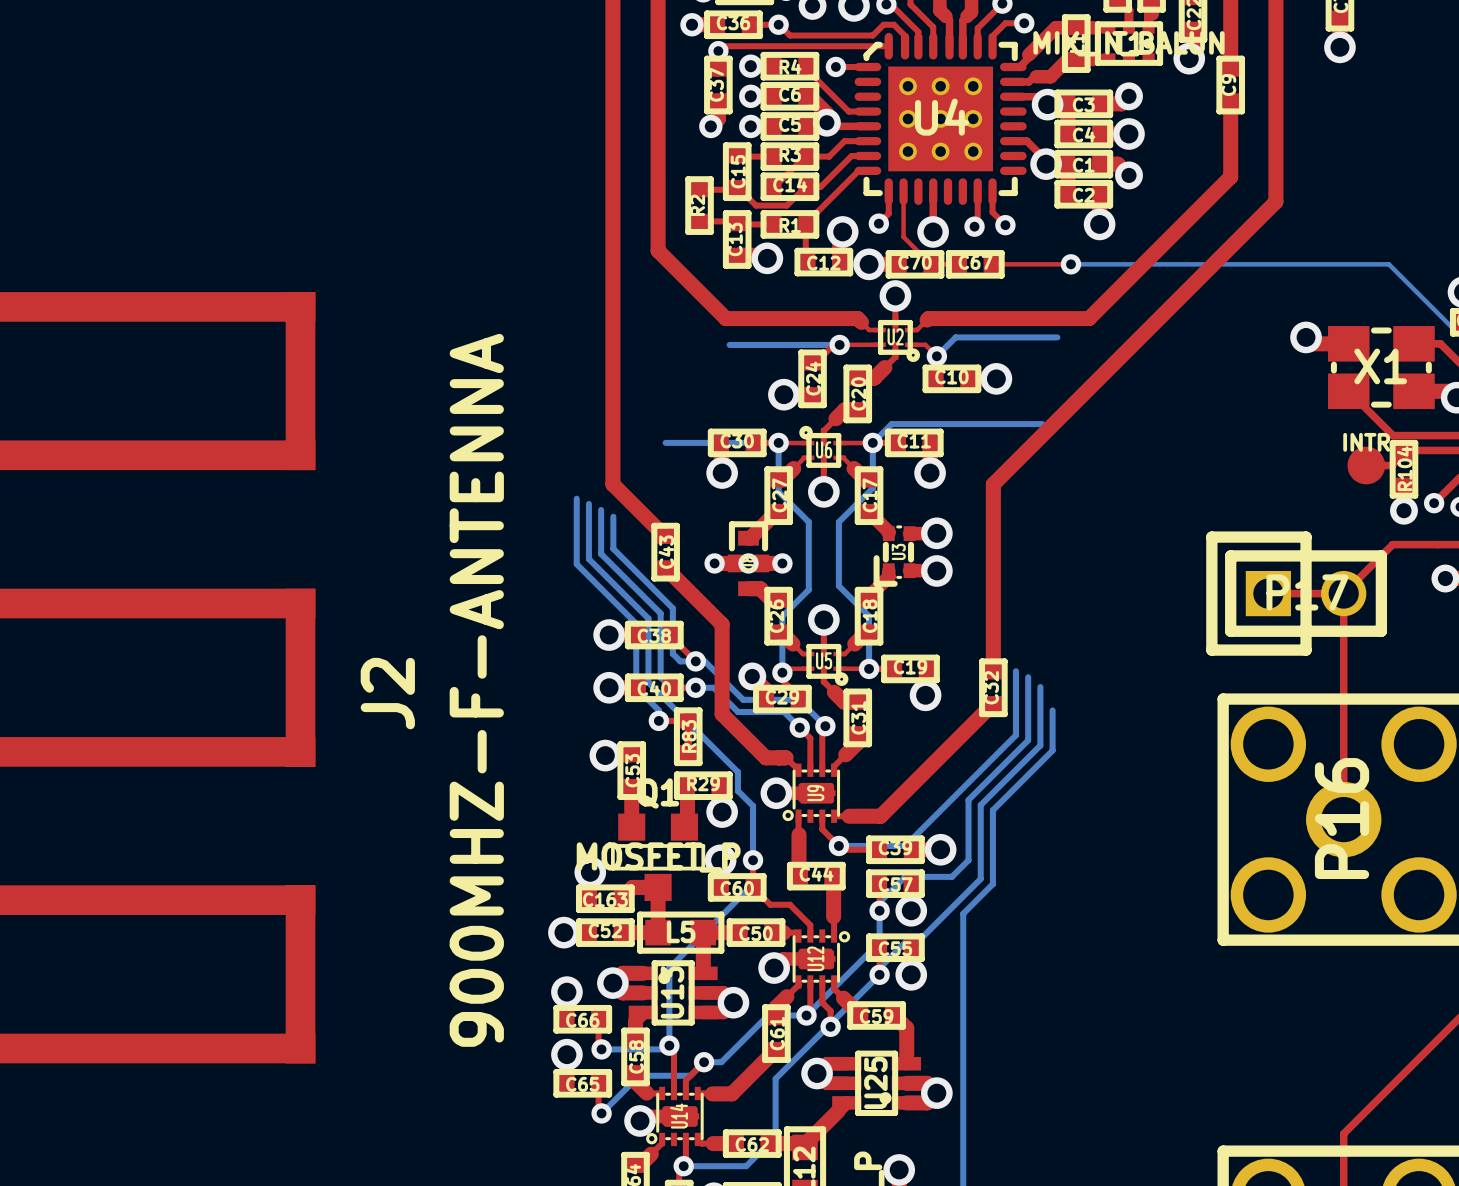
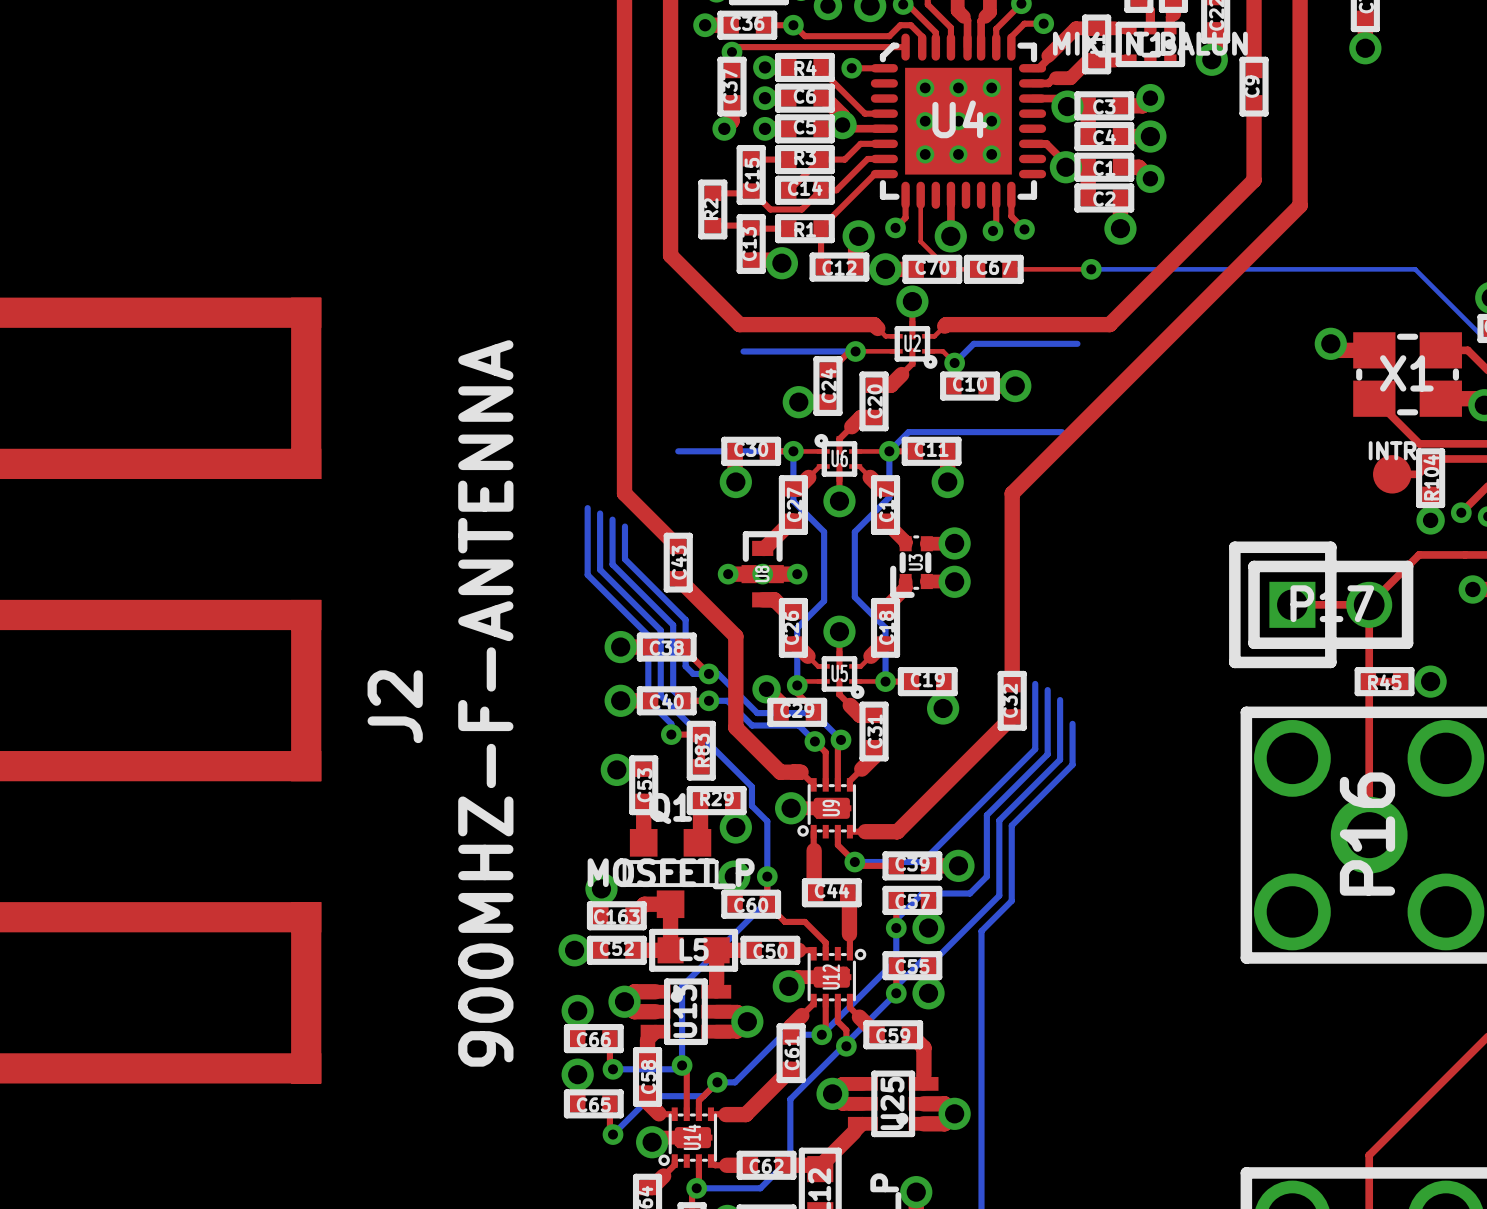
R45: none -> (1384, 681)
via: none -> (1430, 681)

